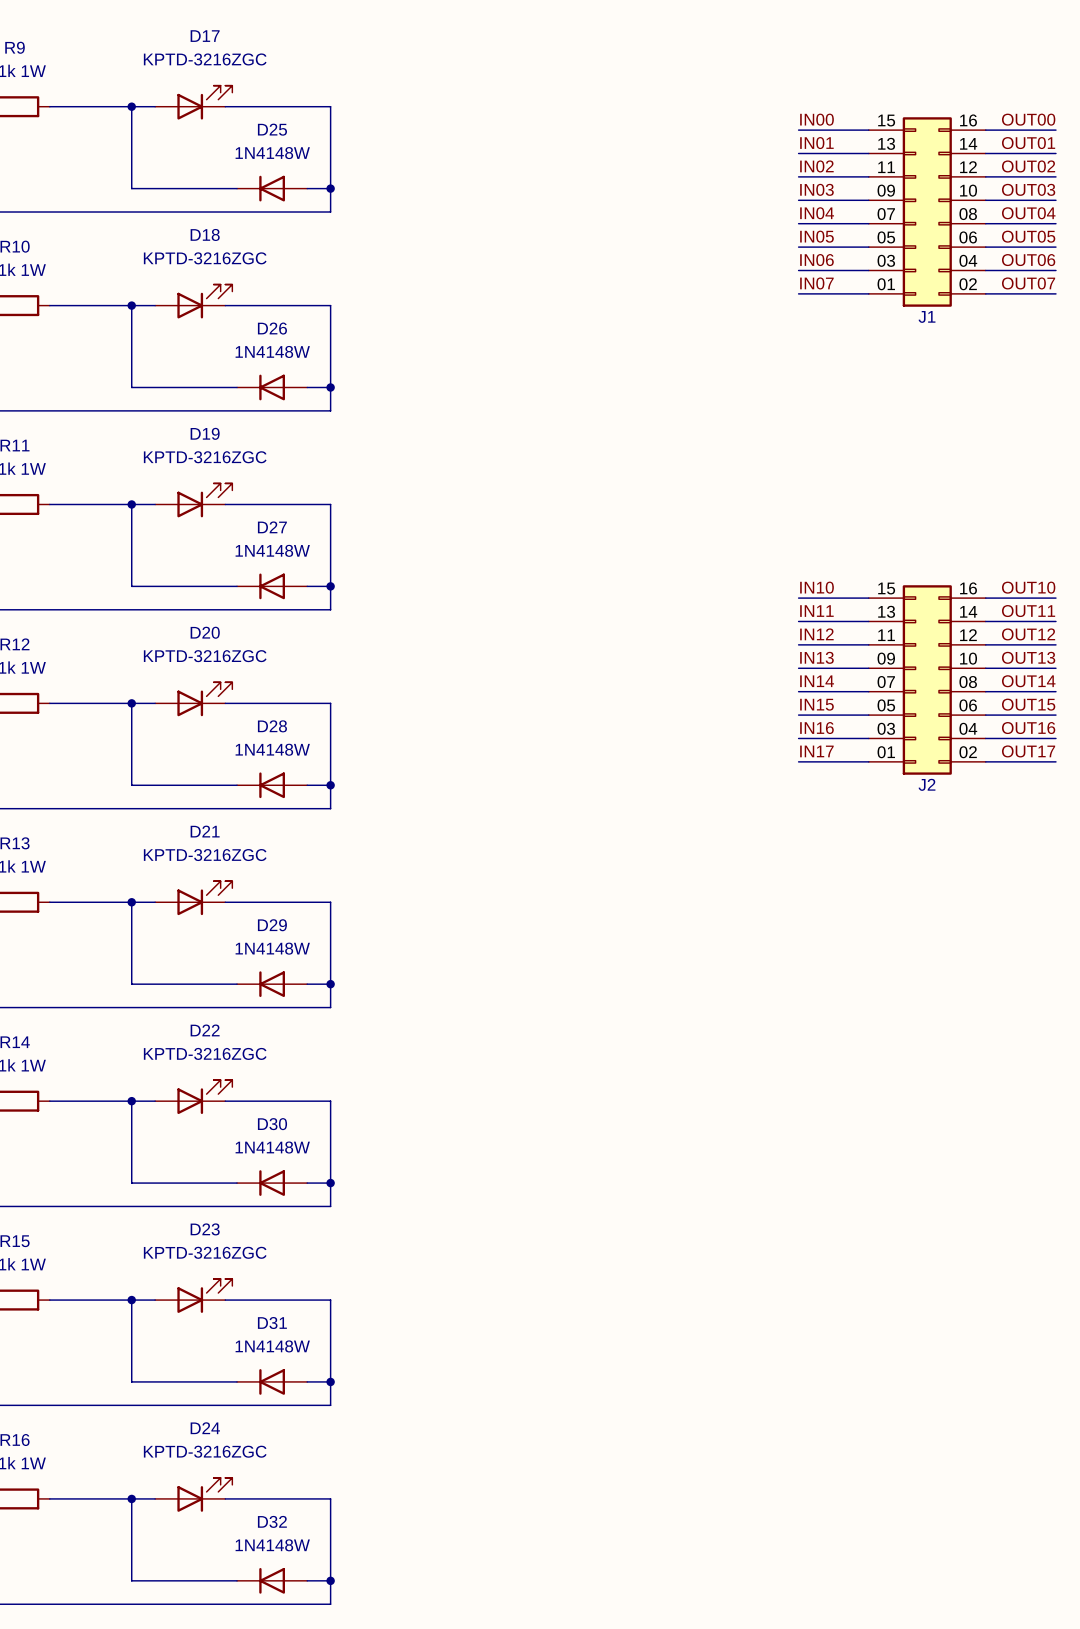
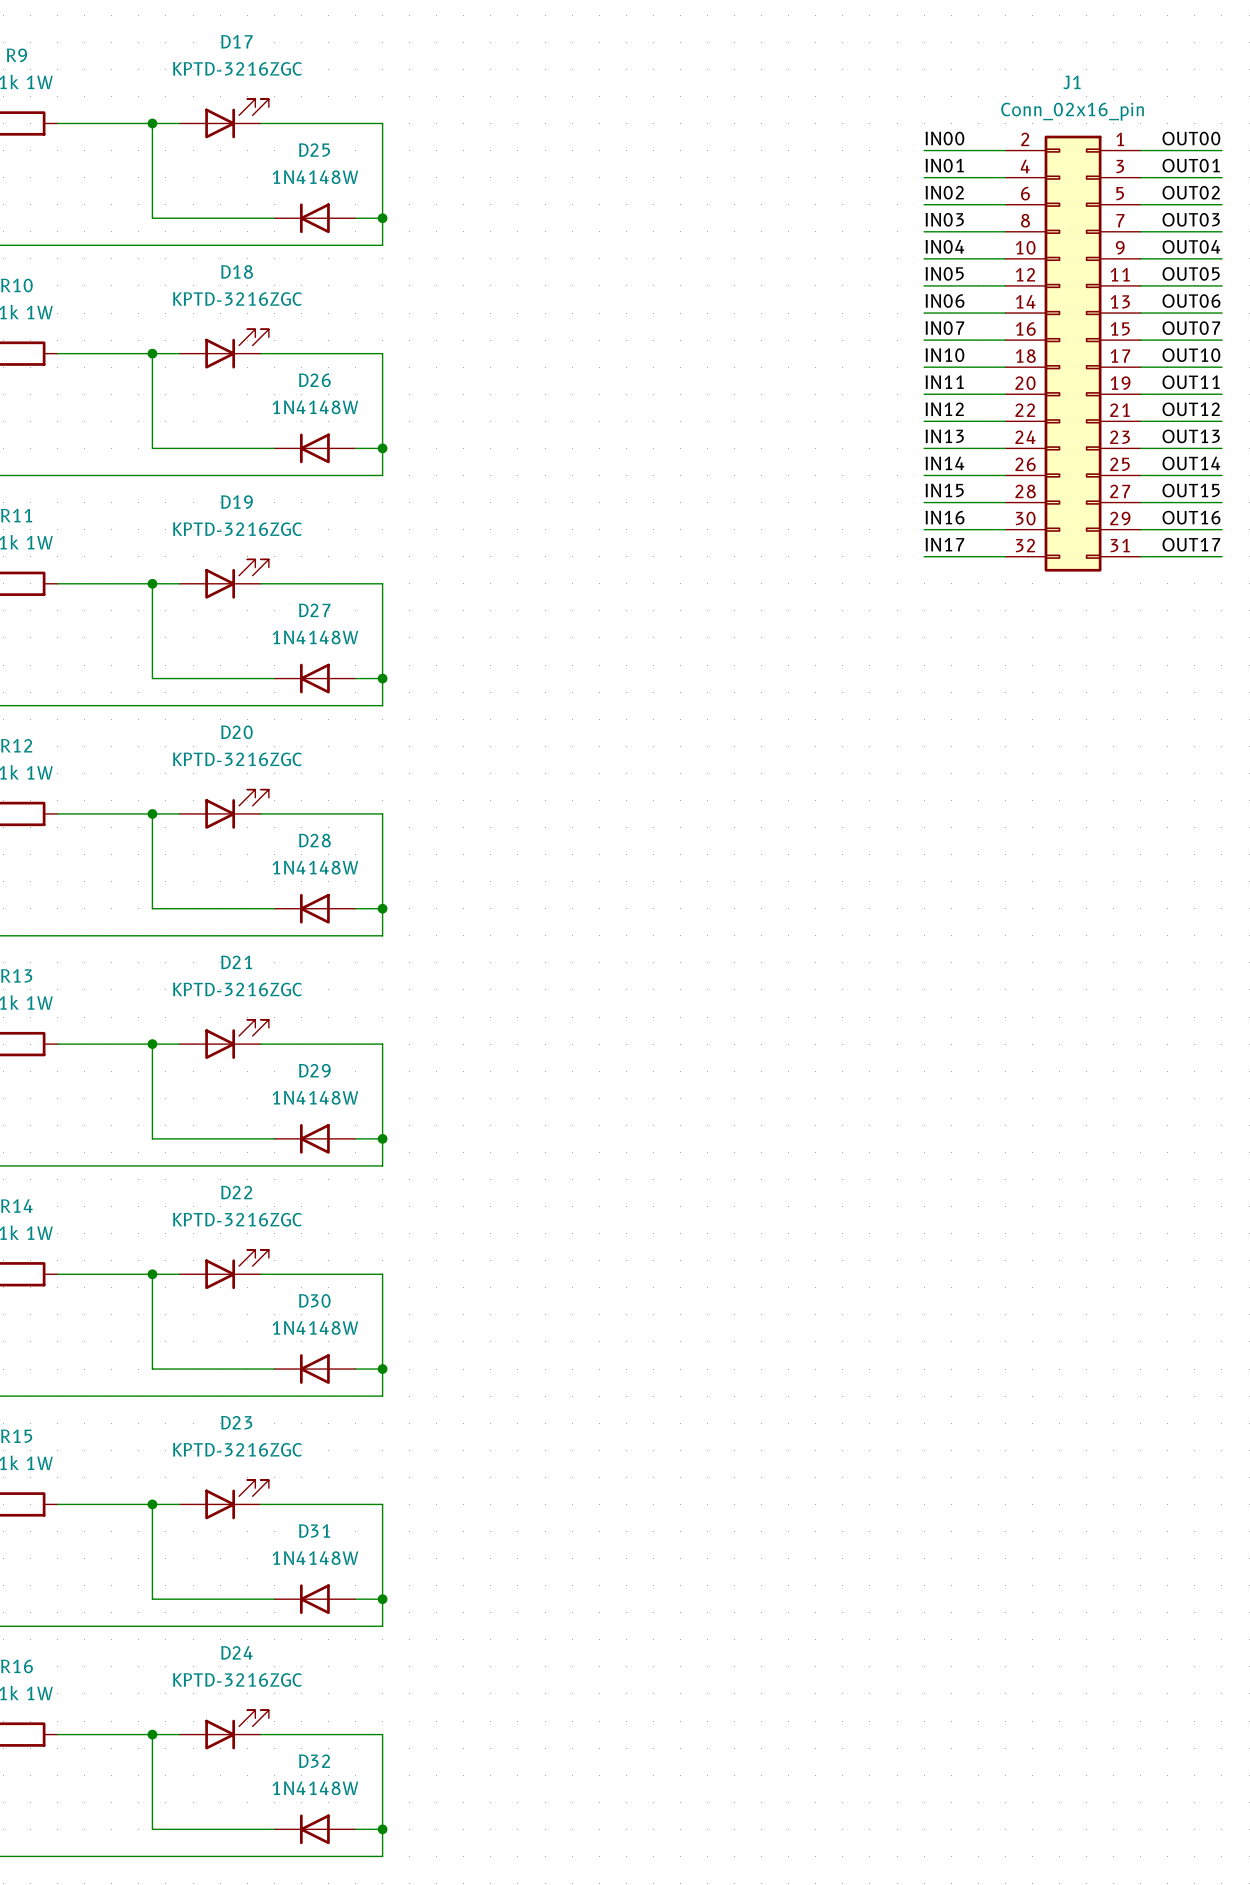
J1 value: none -> Conn_02x16_pin (1072, 111)
J1 symbol: [868, 117, 986, 307] -> [1005, 135, 1141, 572]
label: none -> IN10 (944, 355)
label: none -> OUT10 (1191, 355)
J1 name position: J1 (927, 316) -> J1 (1071, 82)
wire: none -> (924, 367) (1005, 367)
wire: none -> (1140, 367) (1221, 367)
label: none -> IN11 (944, 382)
label: none -> OUT11 (1191, 382)
wire: none -> (924, 394) (1005, 394)
wire: none -> (1140, 394) (1221, 394)
label: none -> IN12 (944, 409)
label: none -> OUT12 (1191, 409)
wire: none -> (924, 421) (1005, 421)
wire: none -> (1140, 421) (1221, 421)
label: none -> IN13 (944, 436)
label: none -> OUT13 (1191, 436)
label: none -> IN14 (944, 463)
label: none -> OUT14 (1191, 463)
label: none -> IN15 (944, 490)
label: none -> OUT15 (1191, 490)
label: none -> IN16 (945, 517)
label: none -> OUT16 (1191, 517)
label: none -> IN17 (944, 544)
label: none -> OUT17 (1191, 544)
label: IN10 (817, 587) -> none
label: OUT10 (1028, 587) -> none
wire: (798, 598) (868, 598) -> (924, 448) (1005, 448)
wire: (985, 598) (1055, 598) -> (1140, 448) (1221, 448)
label: IN11 (816, 611) -> none
label: OUT11 (1028, 611) -> none
wire: (798, 621) (868, 621) -> (924, 475) (1005, 475)
wire: (985, 621) (1055, 621) -> (1140, 475) (1221, 475)
label: IN12 (816, 634) -> none
label: OUT12 (1028, 634) -> none
wire: (798, 644) (868, 644) -> (924, 502) (1005, 502)
wire: (985, 644) (1055, 644) -> (1140, 502) (1221, 502)
label: IN13 (816, 657) -> none
label: OUT13 (1028, 657) -> none
wire: (798, 668) (868, 668) -> (924, 529) (1005, 529)
wire: (985, 668) (1055, 668) -> (1140, 529) (1221, 529)
J2: (927, 679) -> none
label: IN14 (817, 681) -> none
label: OUT14 (1028, 681) -> none
wire: (798, 691) (868, 691) -> (924, 556) (1005, 556)
wire: (985, 691) (1055, 691) -> (1140, 556) (1221, 556)
label: IN15 (816, 704) -> none
label: OUT15 (1028, 704) -> none
wire: (798, 715) (868, 715) -> none
wire: (985, 715) (1055, 715) -> none
label: IN16 (816, 728) -> none
label: OUT16 (1028, 728) -> none
wire: (798, 738) (868, 738) -> none
wire: (985, 738) (1055, 738) -> none
label: IN17 (816, 751) -> none
label: OUT17 (1028, 751) -> none
wire: (798, 761) (868, 761) -> none
wire: (985, 761) (1055, 761) -> none

